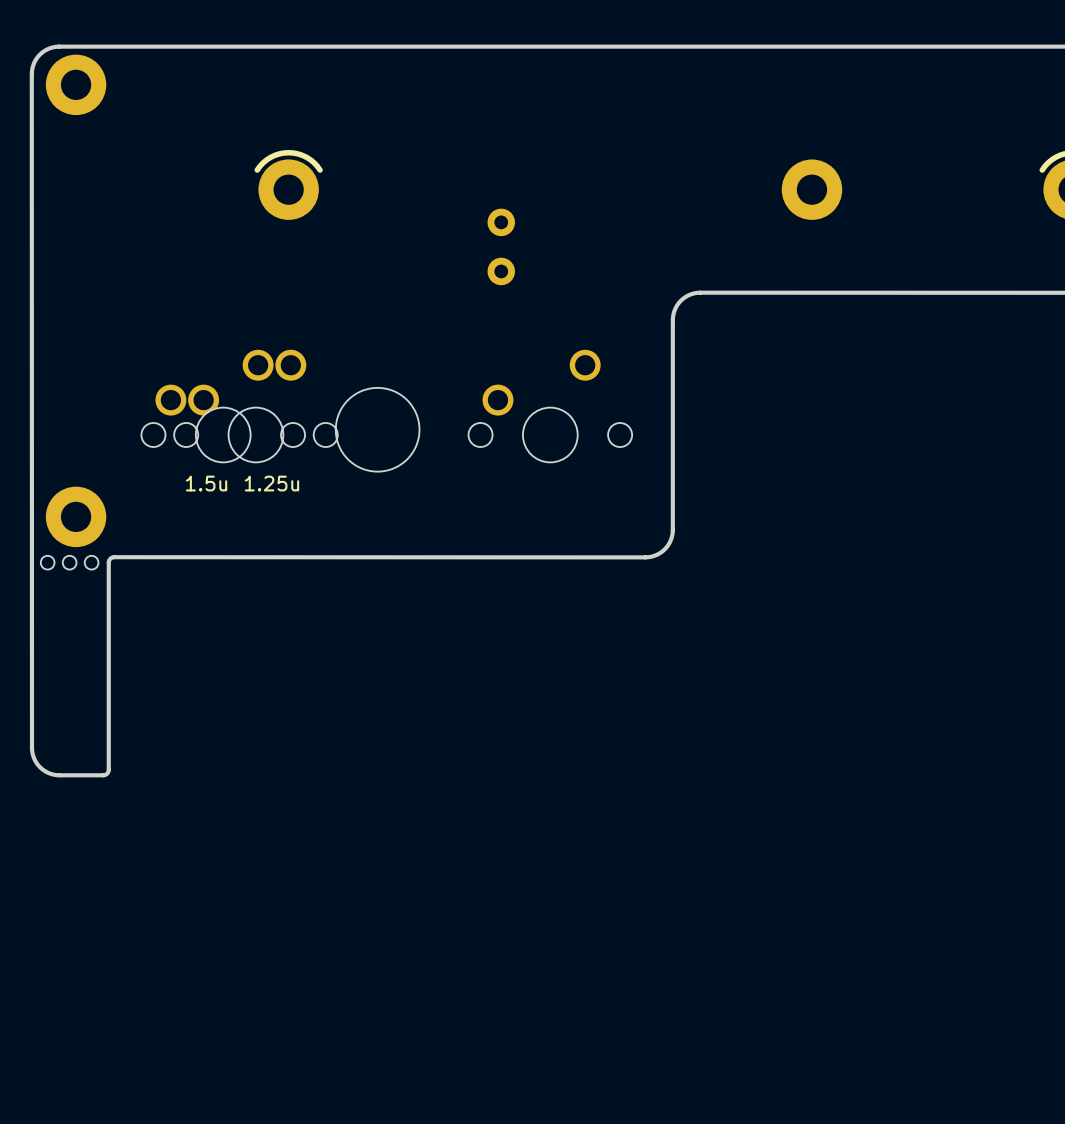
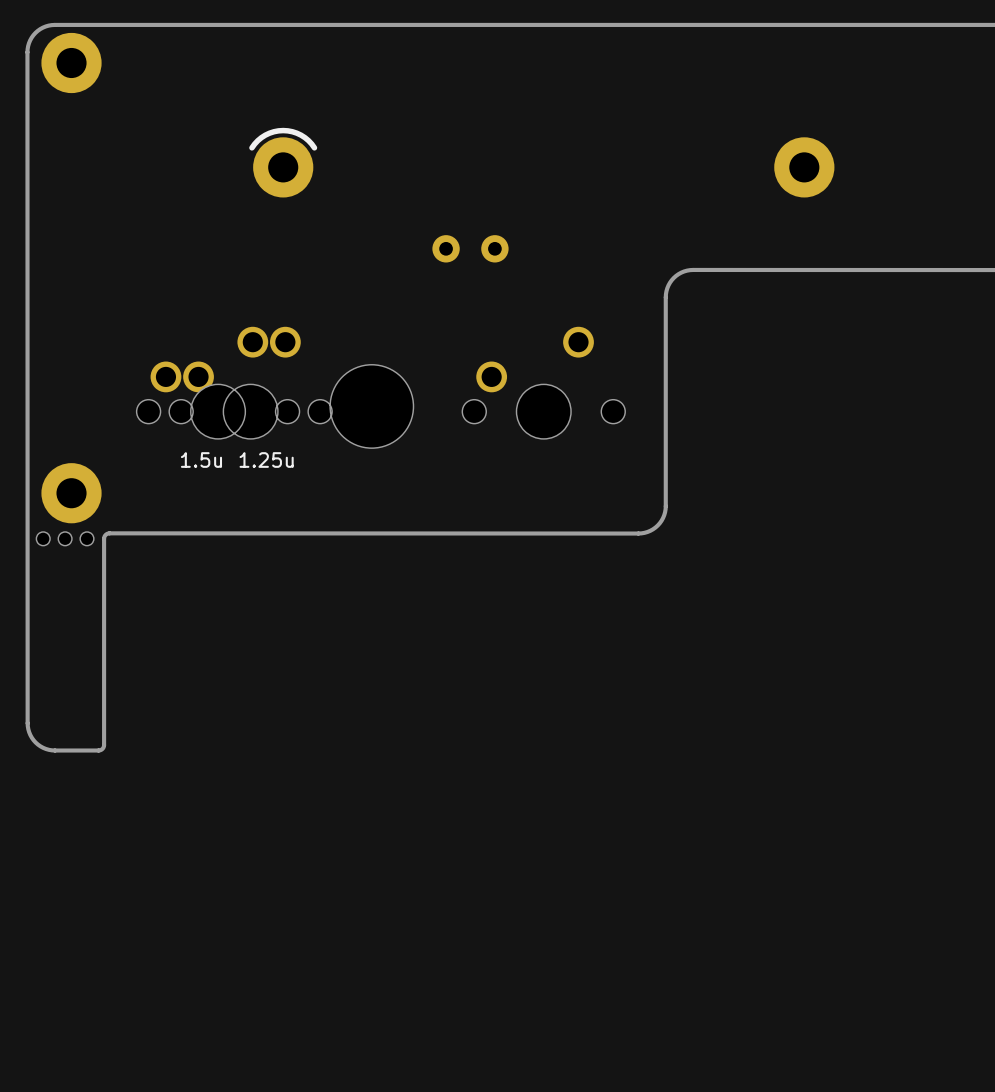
part position: (501, 222) -> (446, 248)

